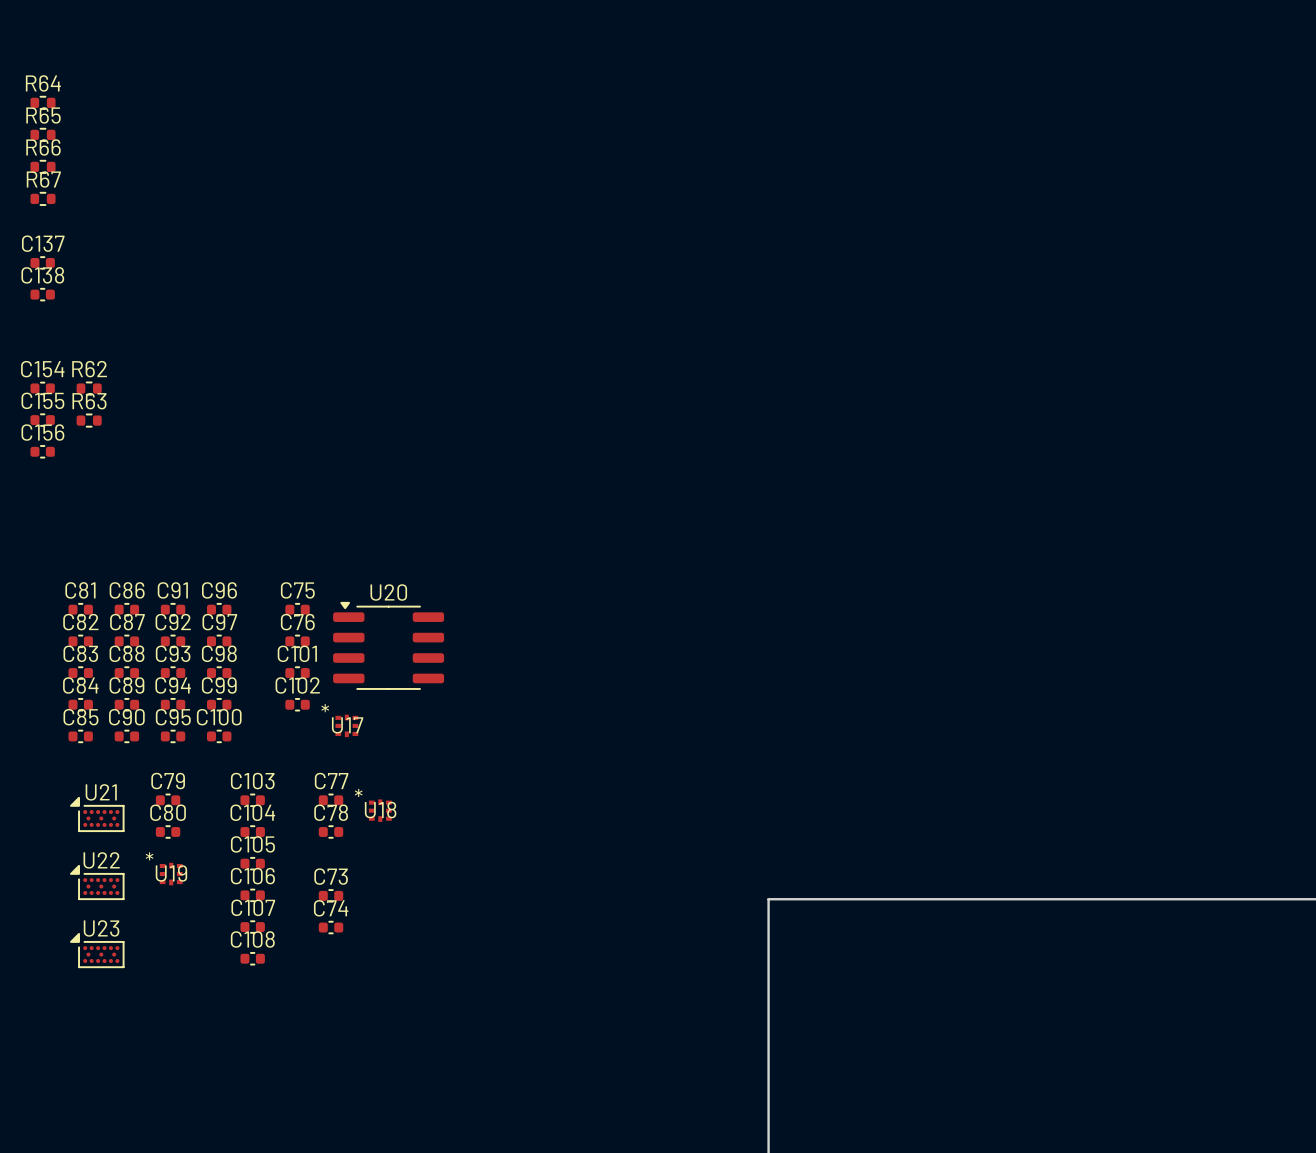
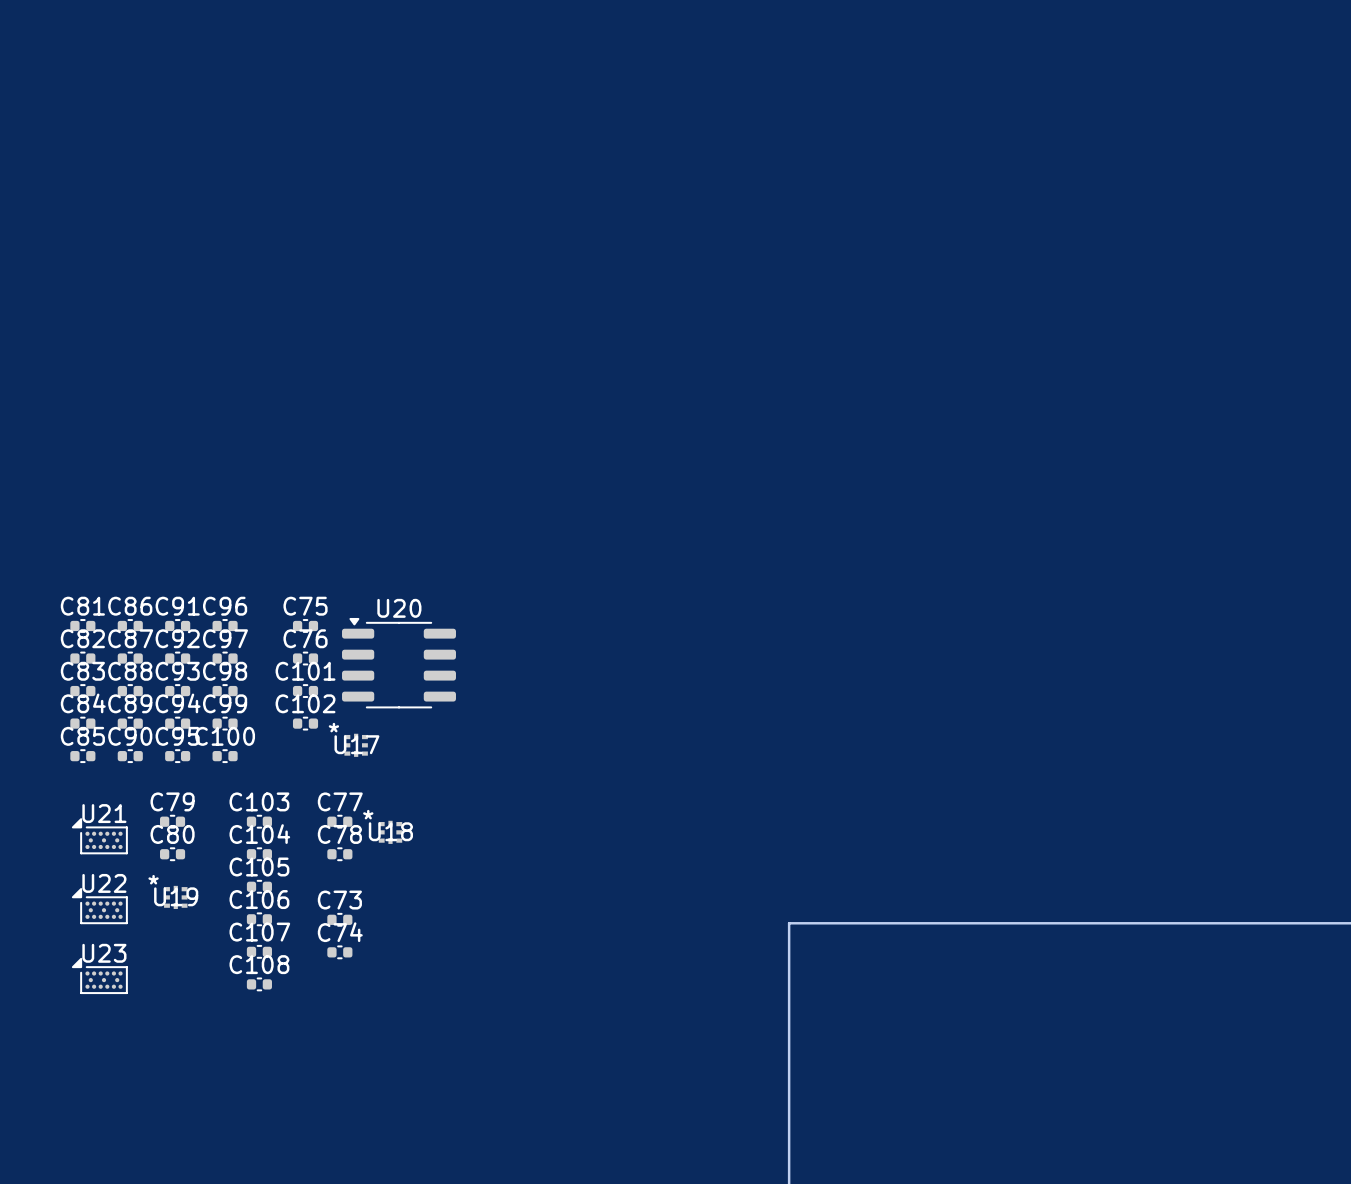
R64: (42, 102) -> none
R65: (42, 134) -> none
R66: (42, 166) -> none
R67: (42, 198) -> none
C137: (42, 262) -> none
C138: (42, 294) -> none
C154: (42, 388) -> none
R62: (89, 388) -> none
C155: (42, 420) -> none
R63: (89, 420) -> none
C156: (42, 451) -> none

